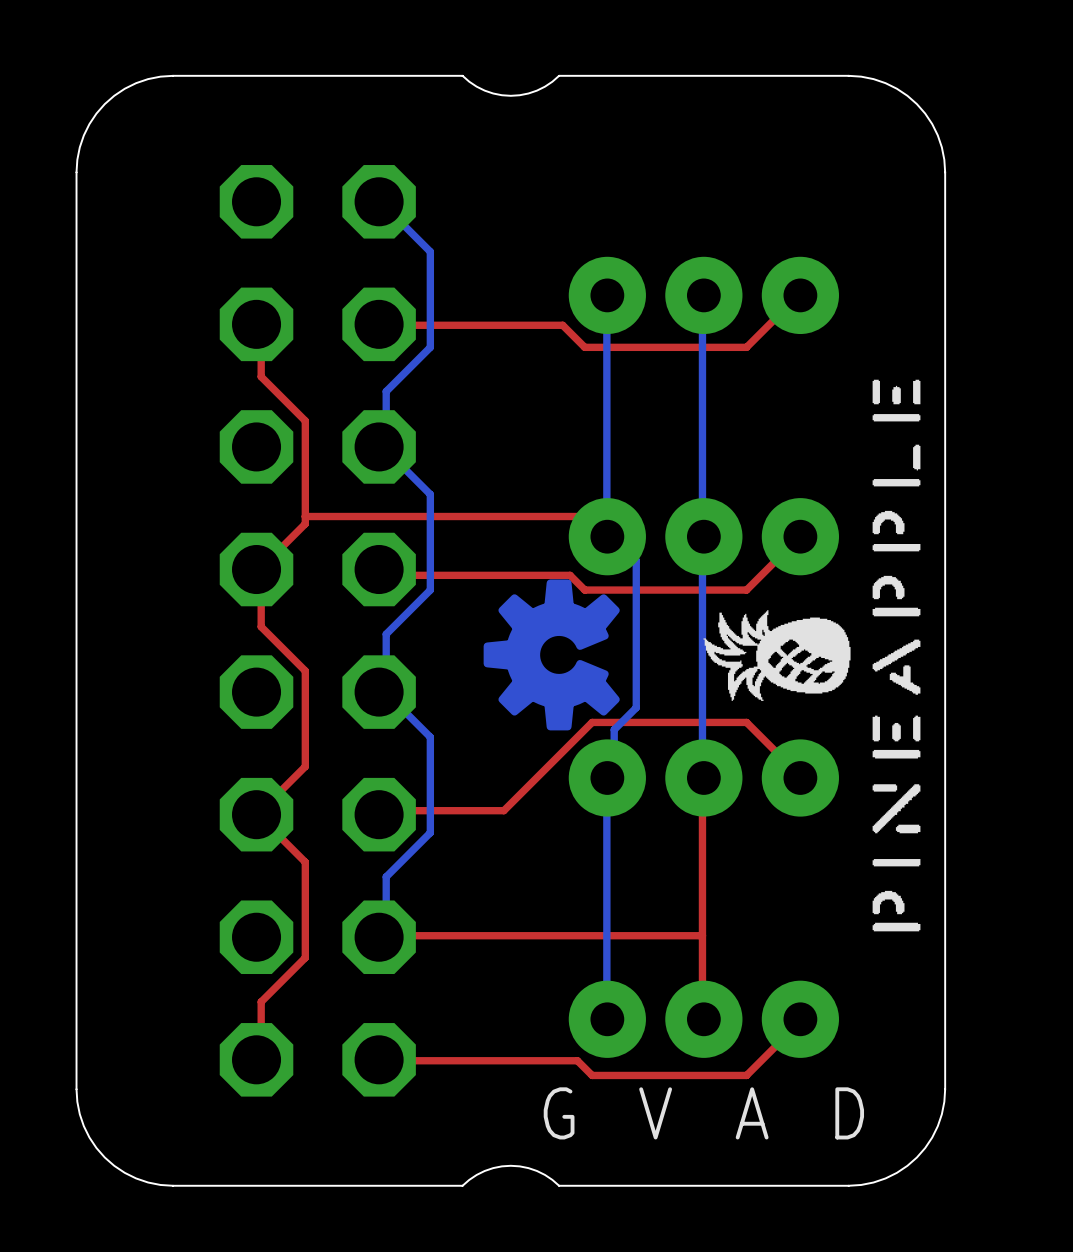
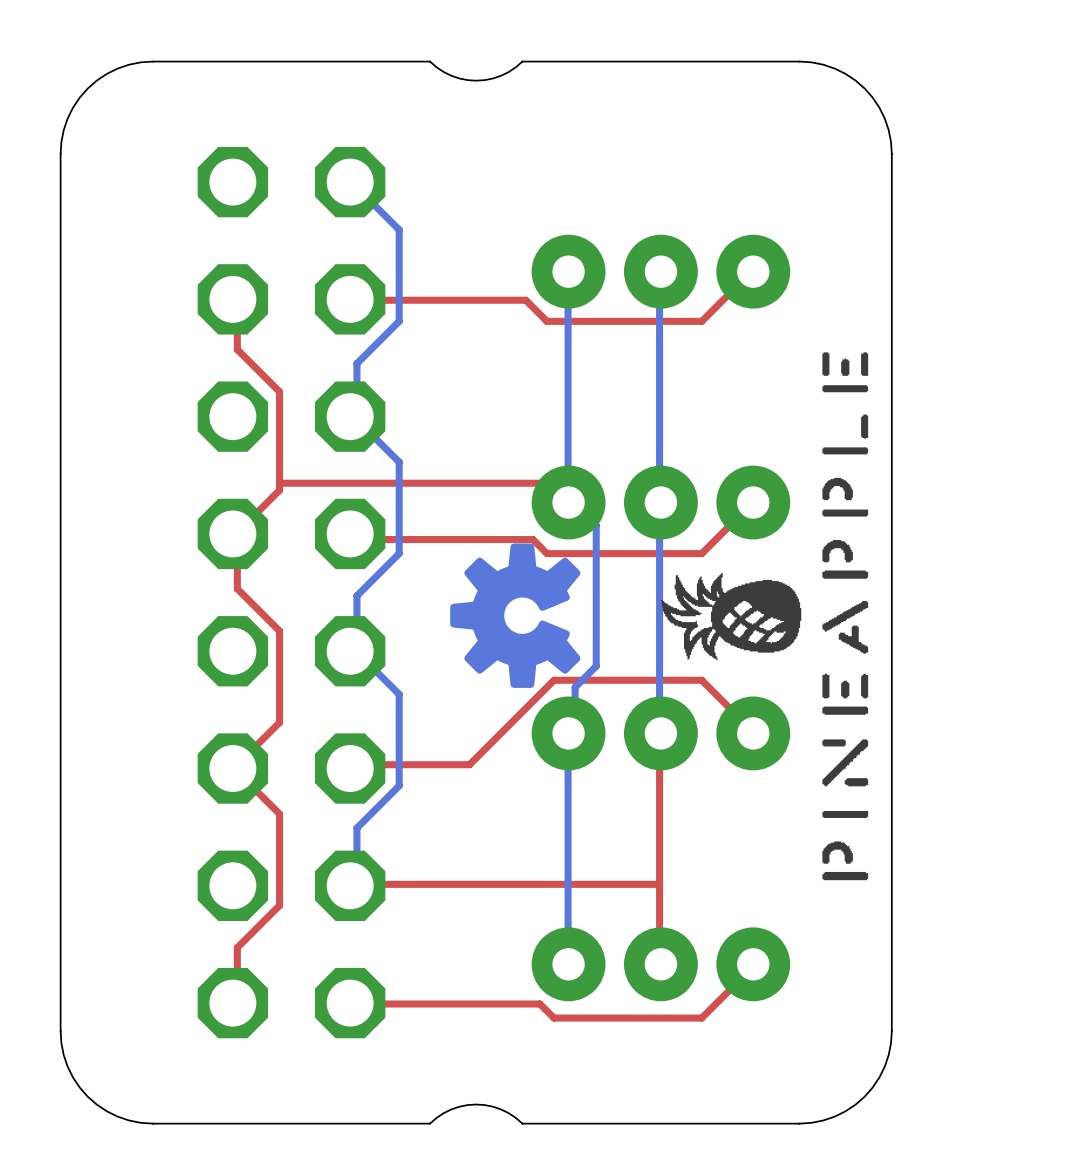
text: G (559, 1113) -> none
text: V (655, 1113) -> none
text: A (752, 1113) -> none
text: D (849, 1113) -> none

